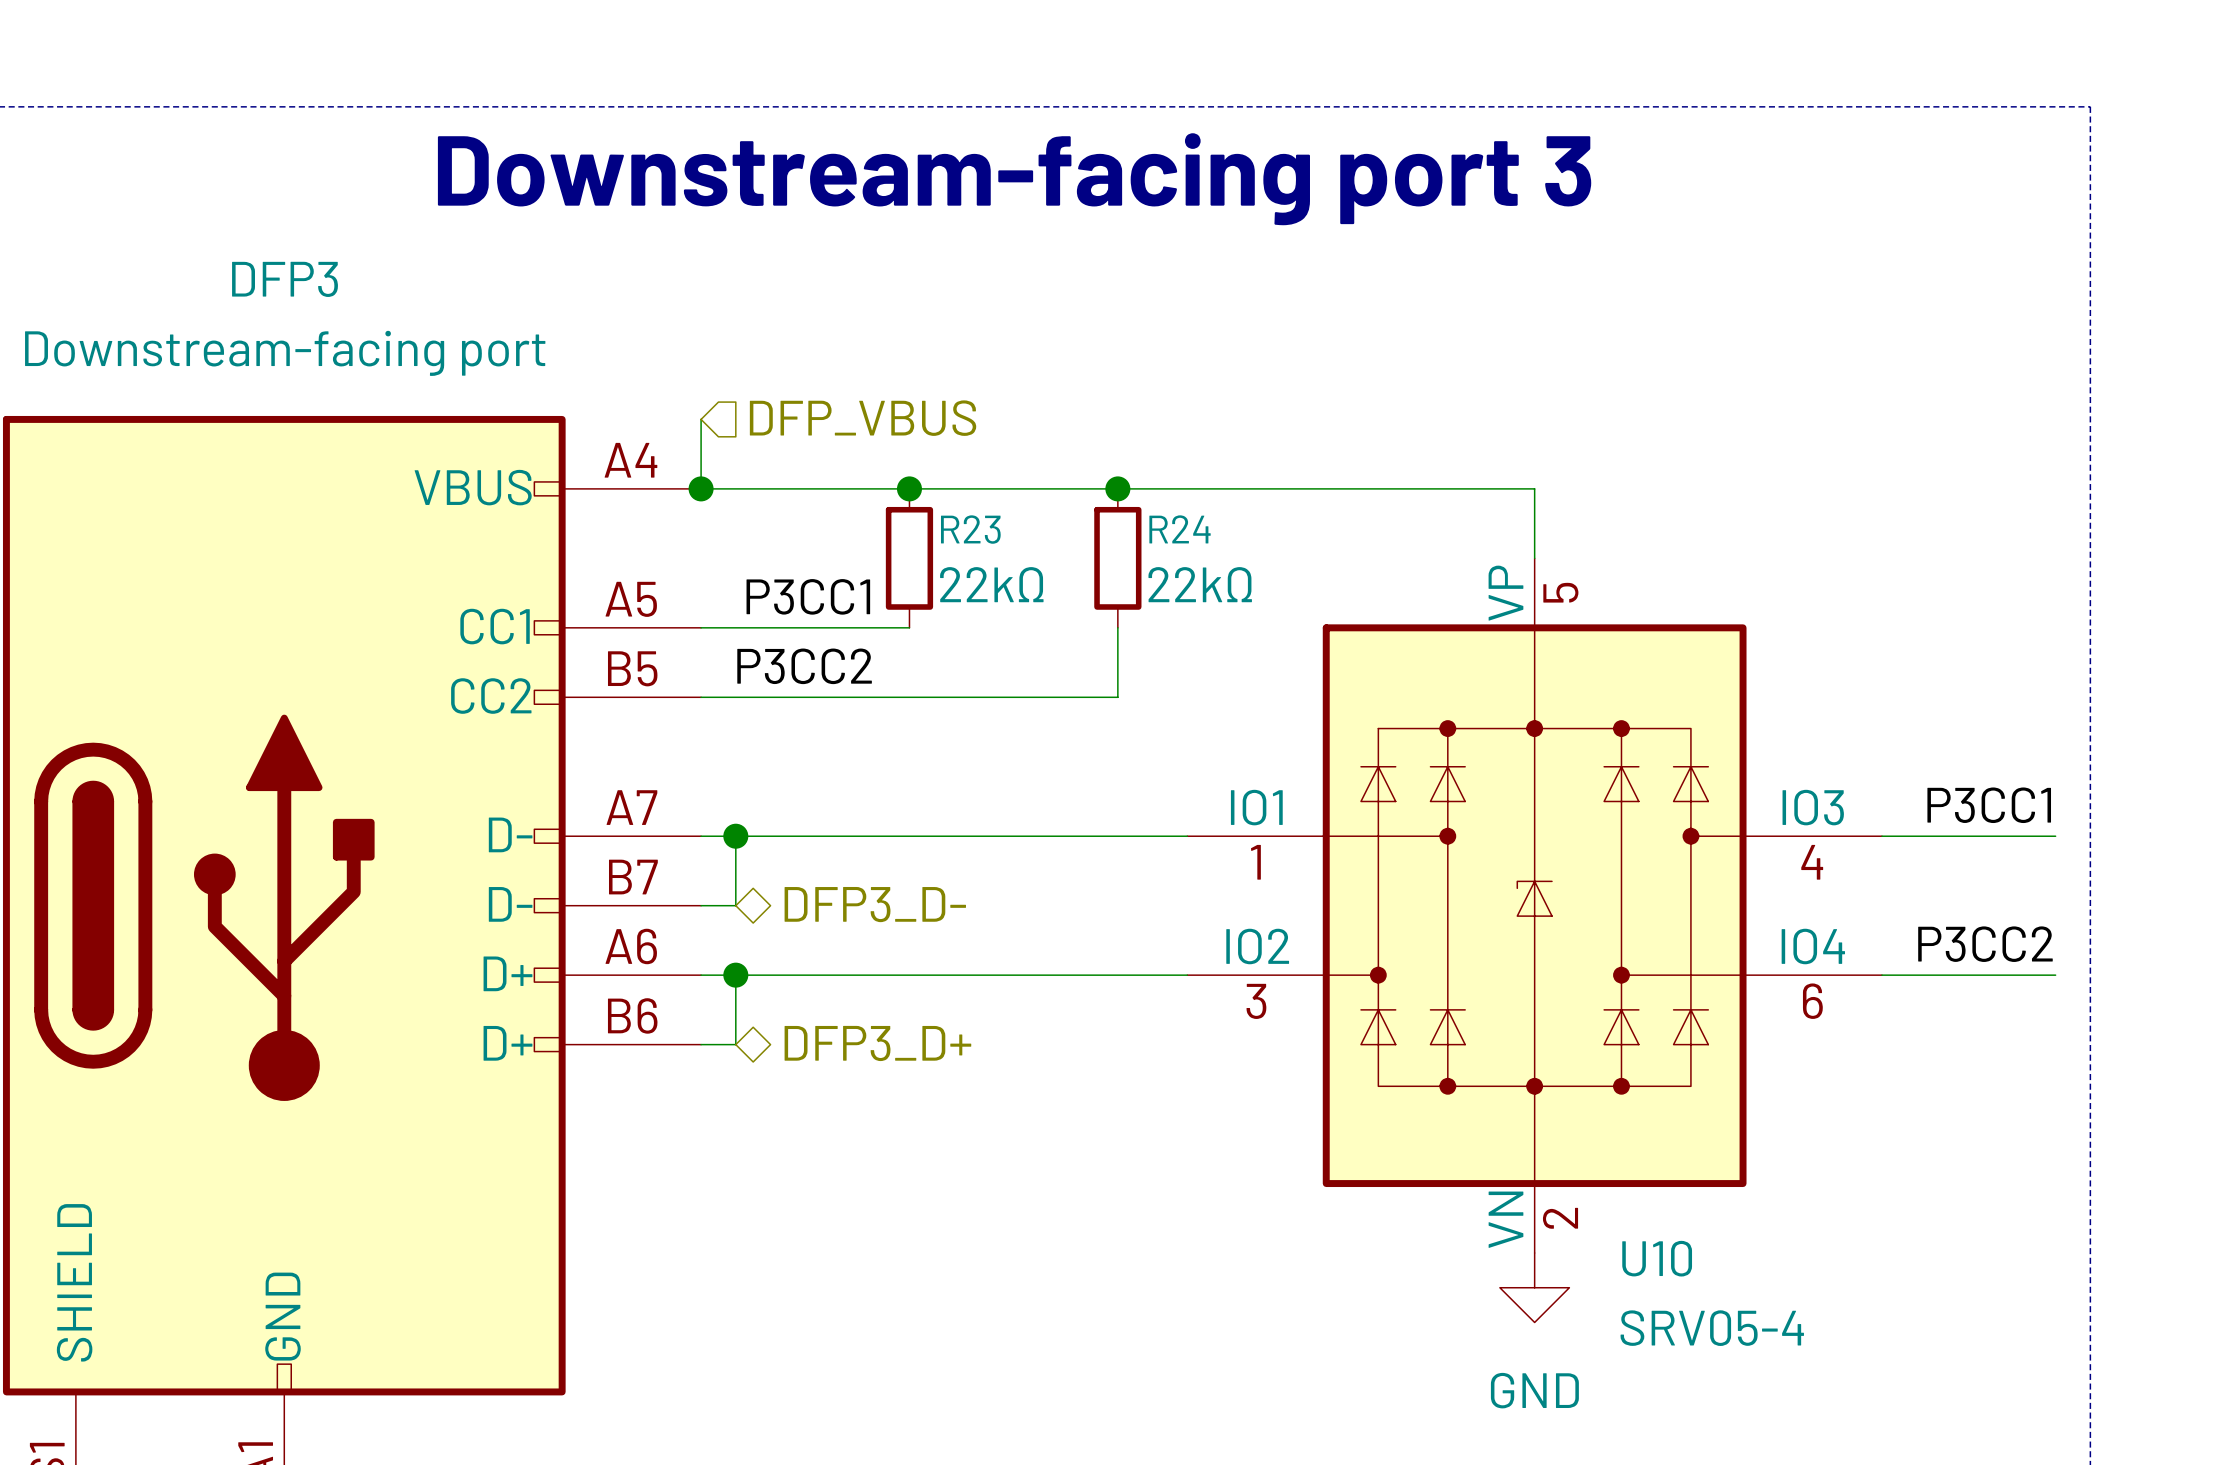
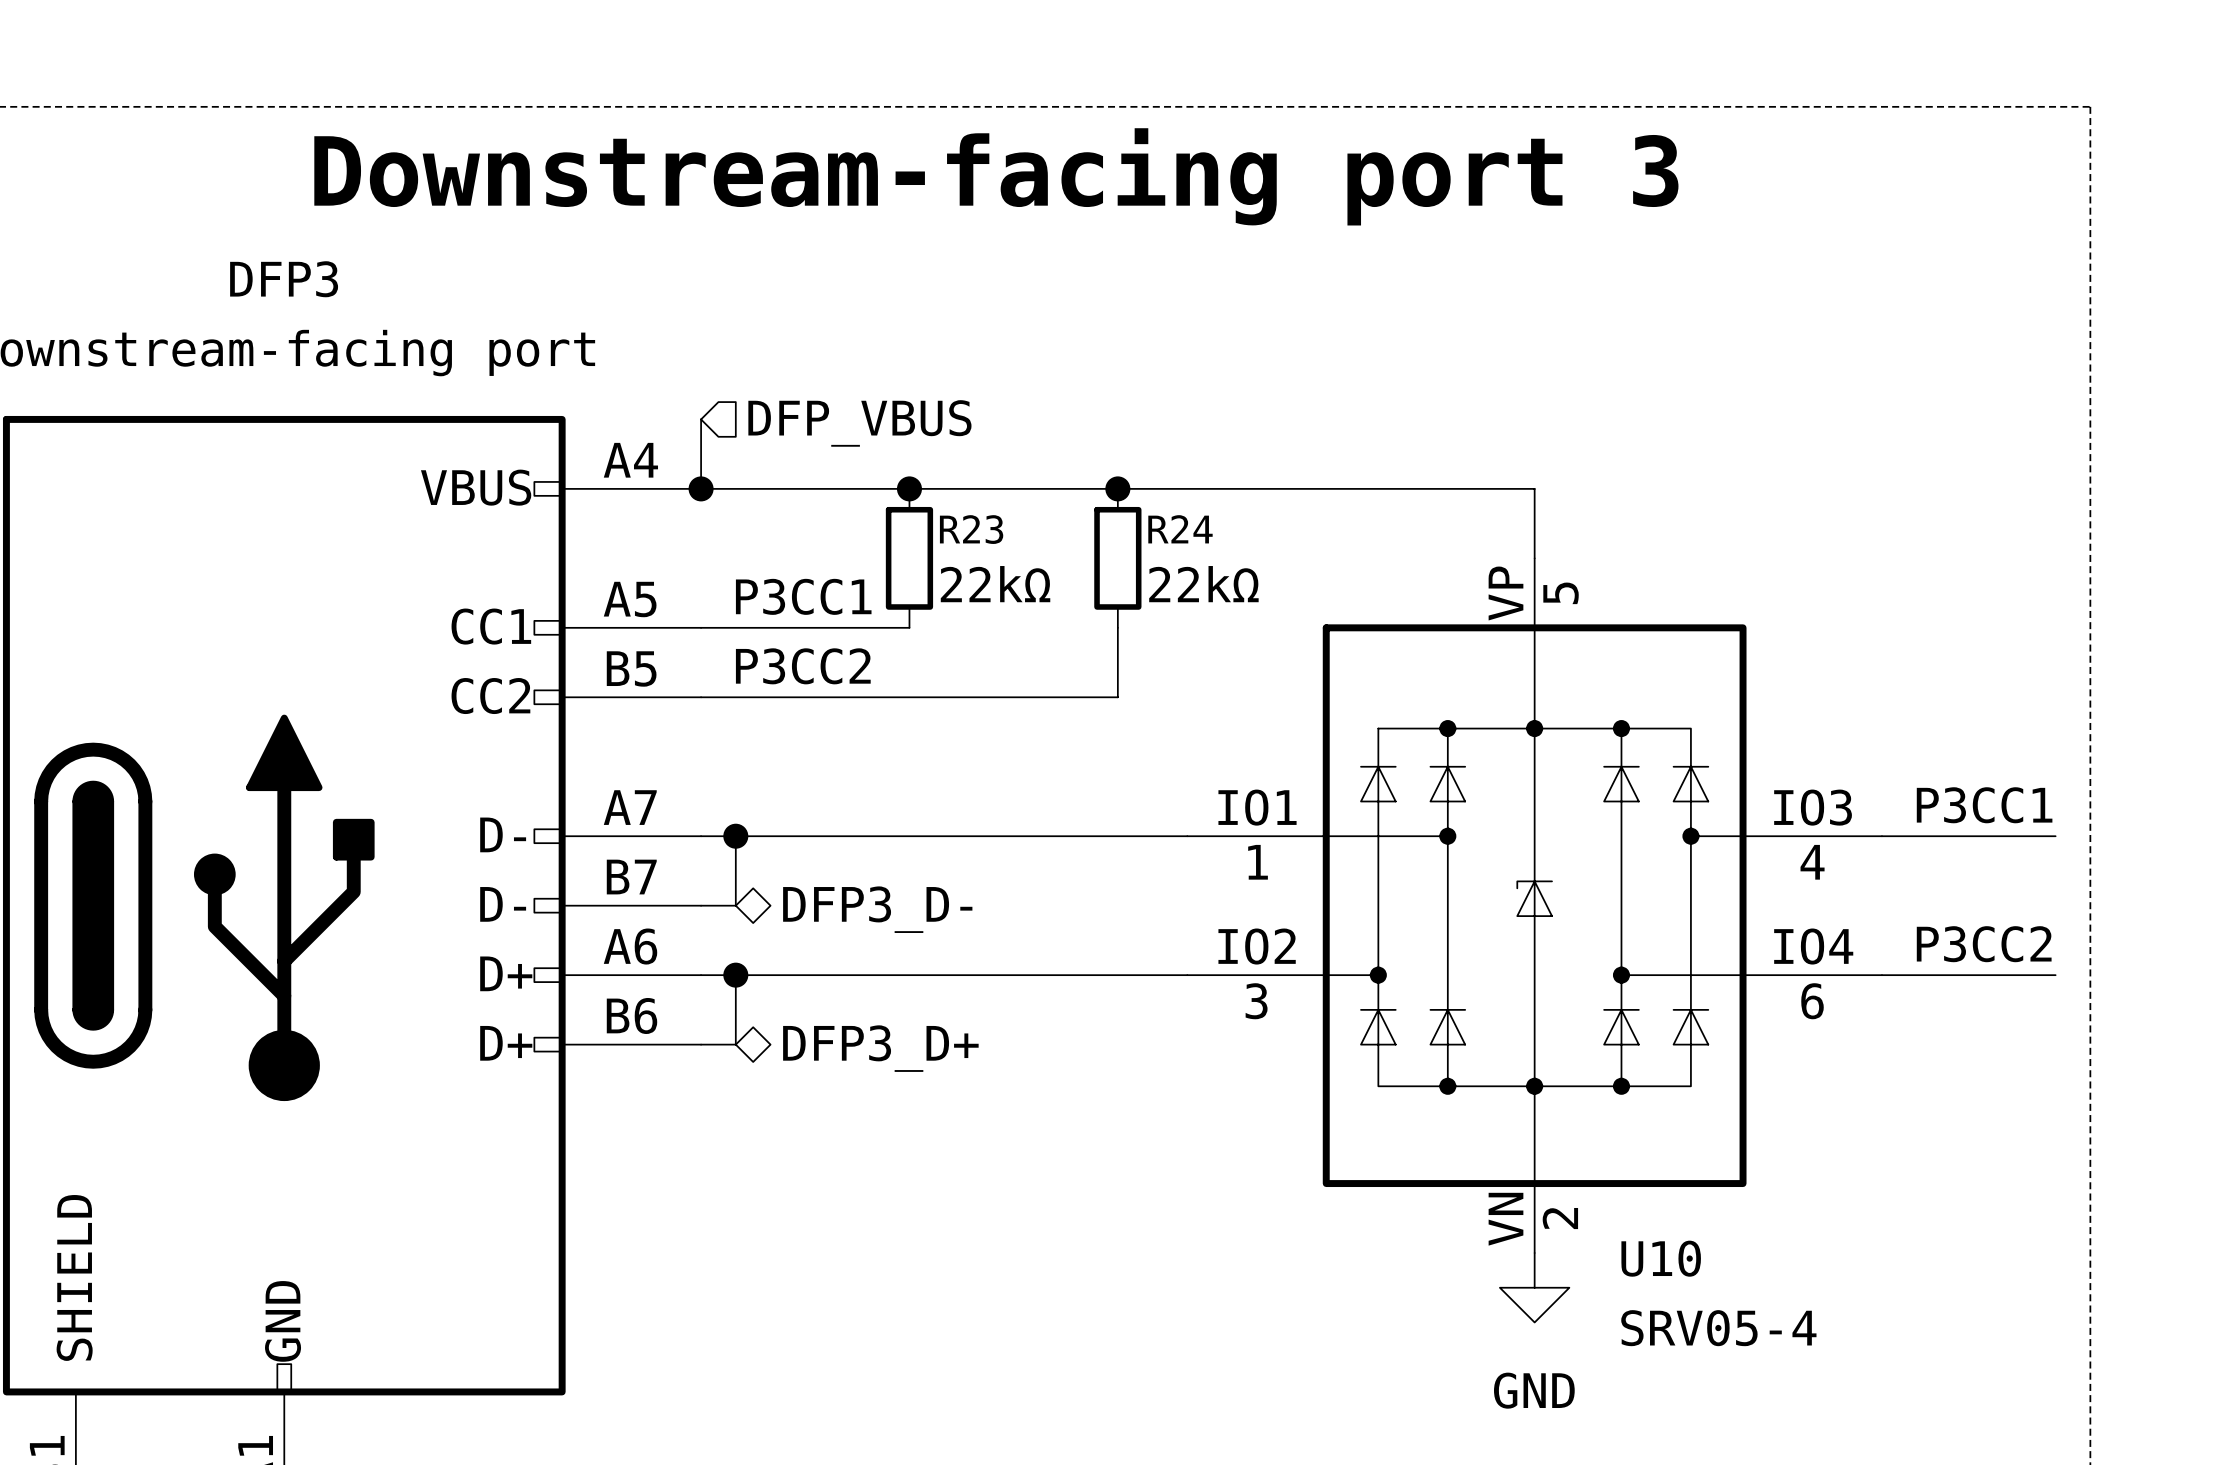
text position: Downstream-facing port 3 (1014, 179) -> Downstream-facing port 3 (996, 176)

